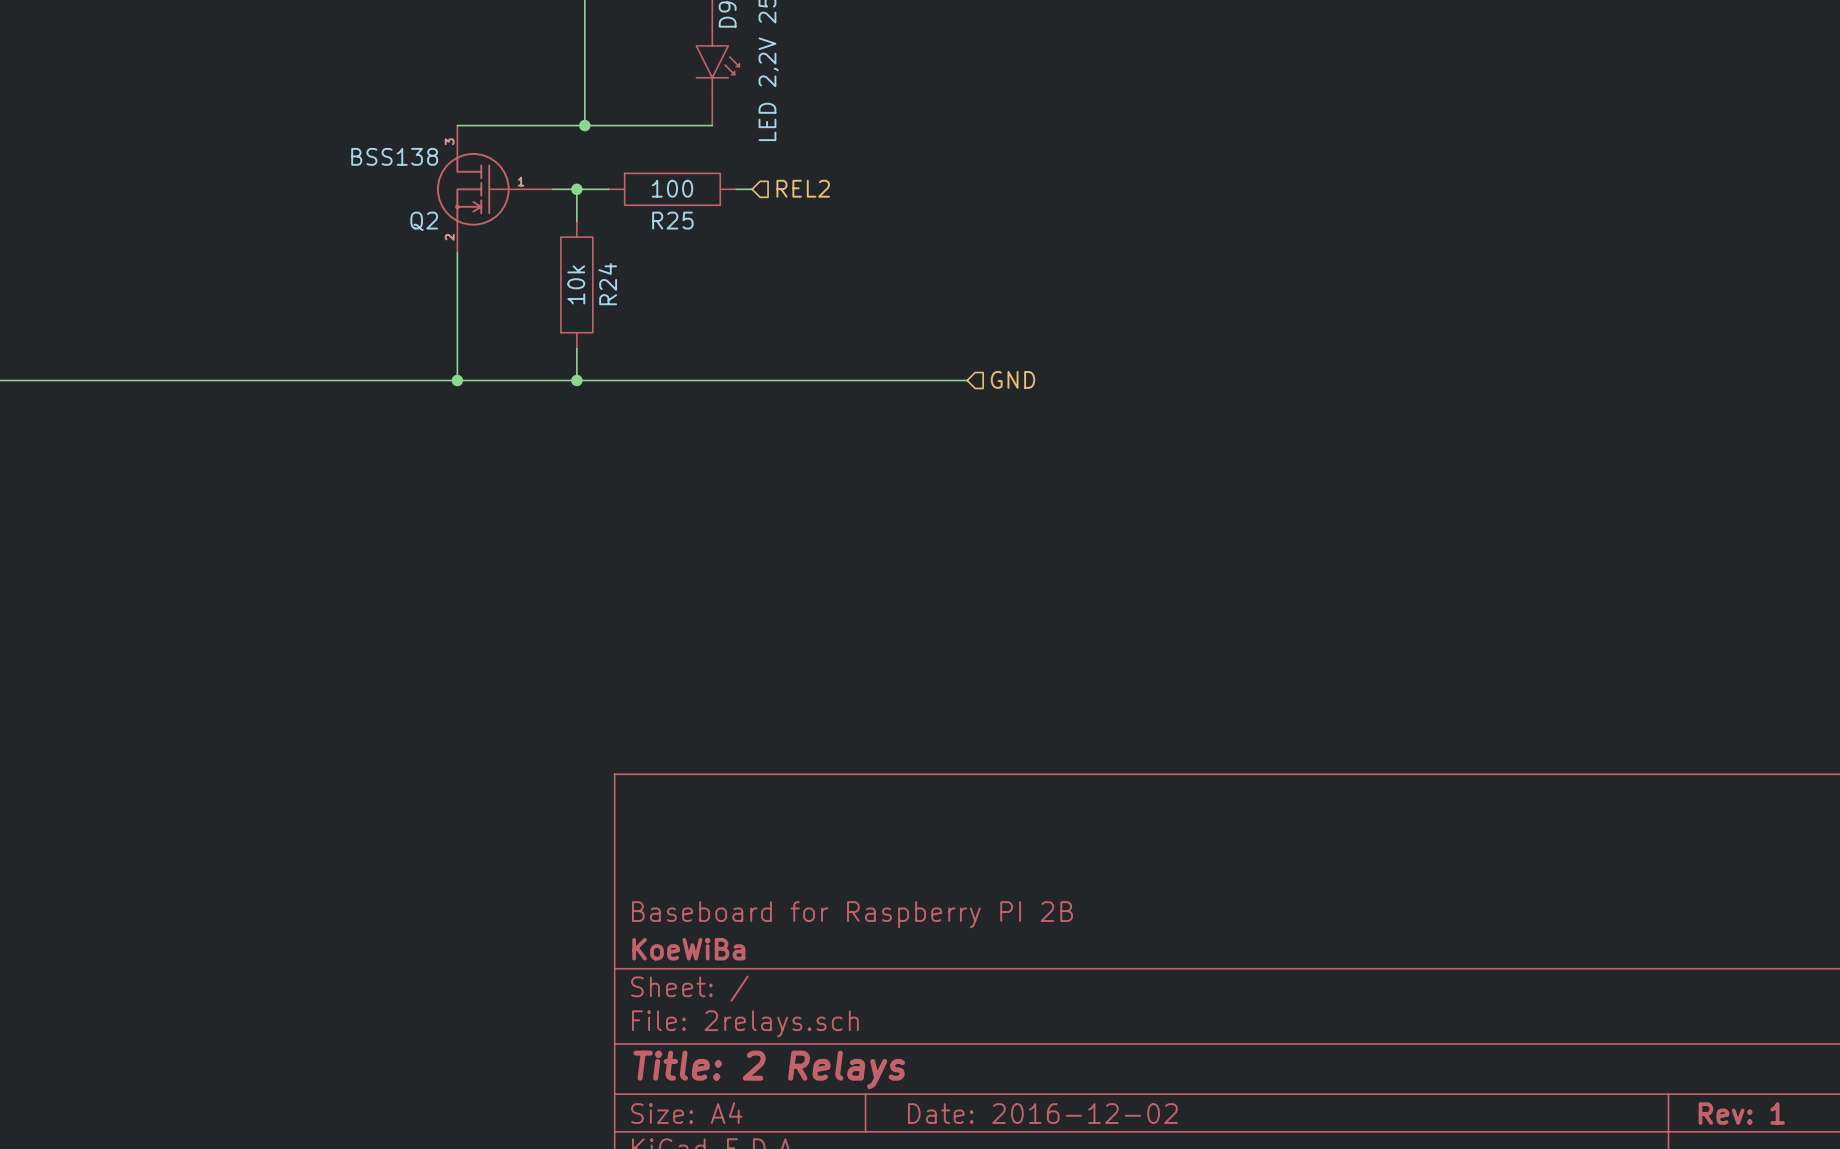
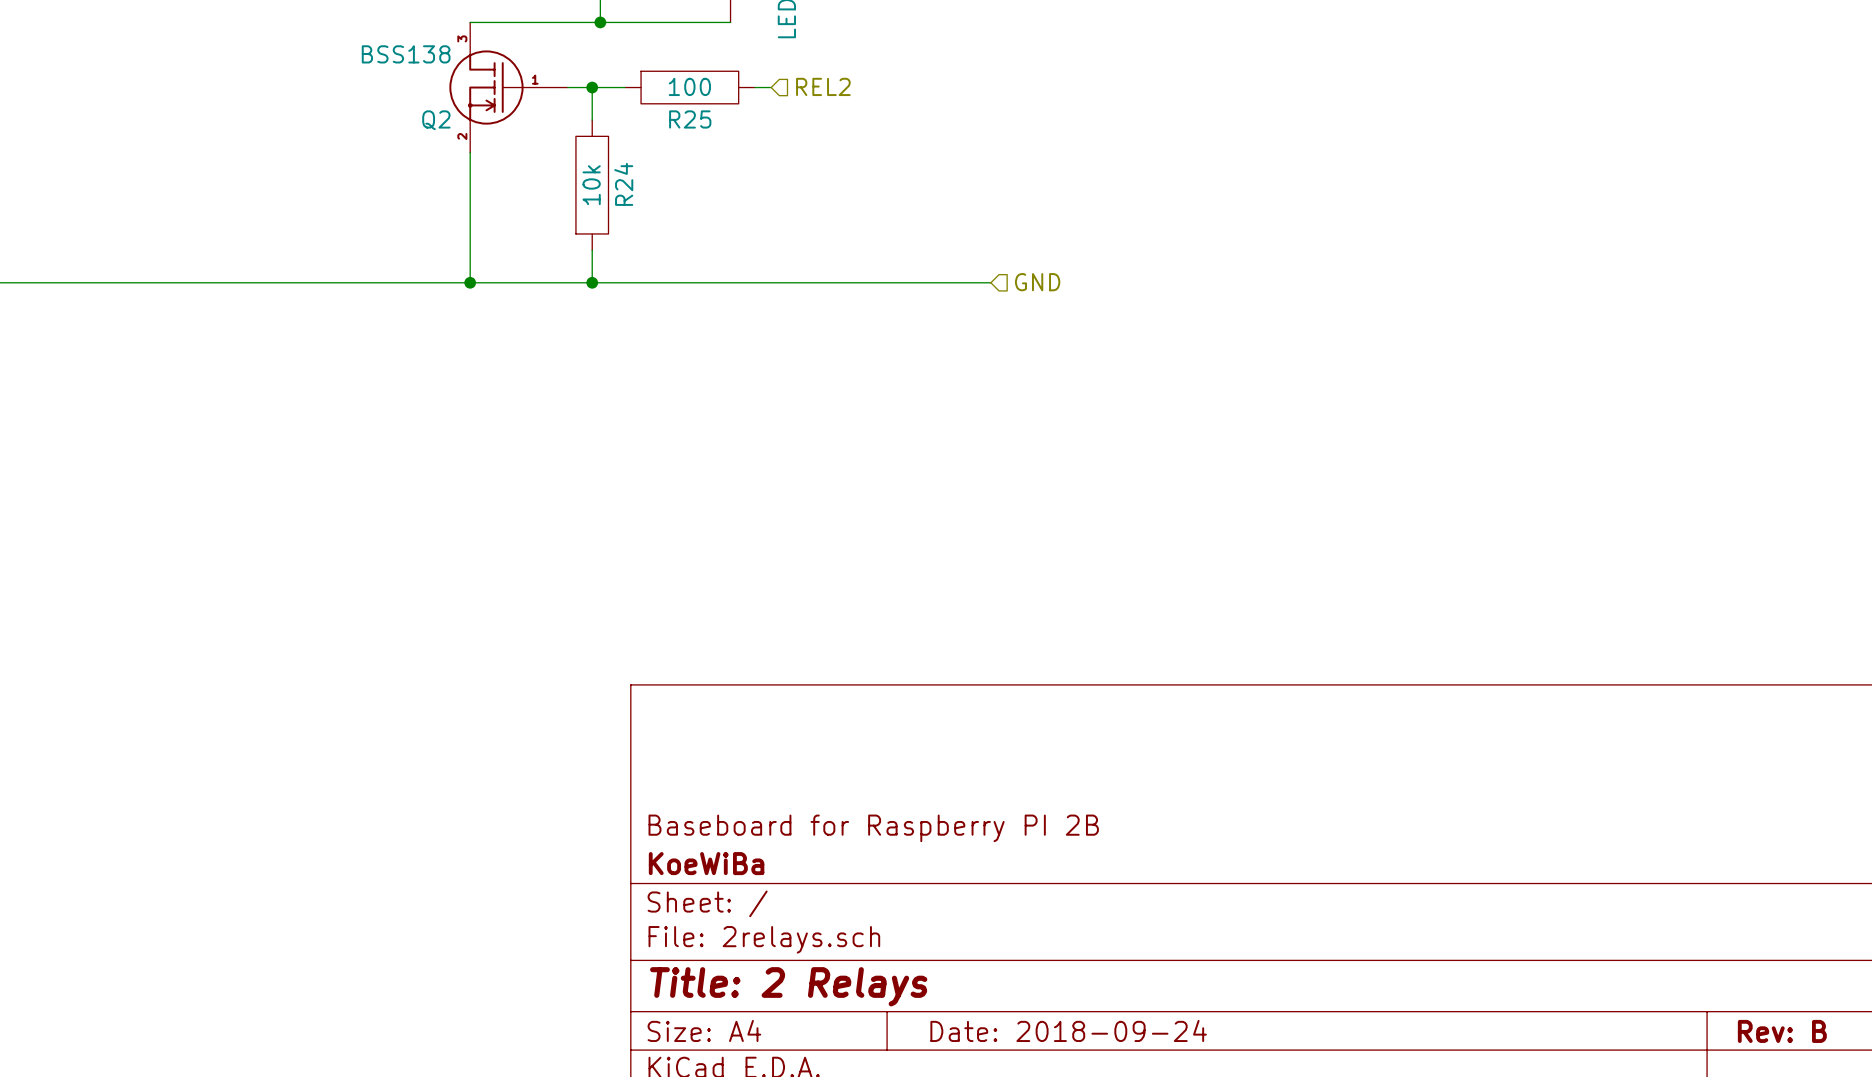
title block: Date: 2016-12-02 (1042, 1113) -> Date: 2018-09-24 (1068, 1030)
title block: Rev: 1 (1741, 1113) -> Rev: B (1782, 1031)

